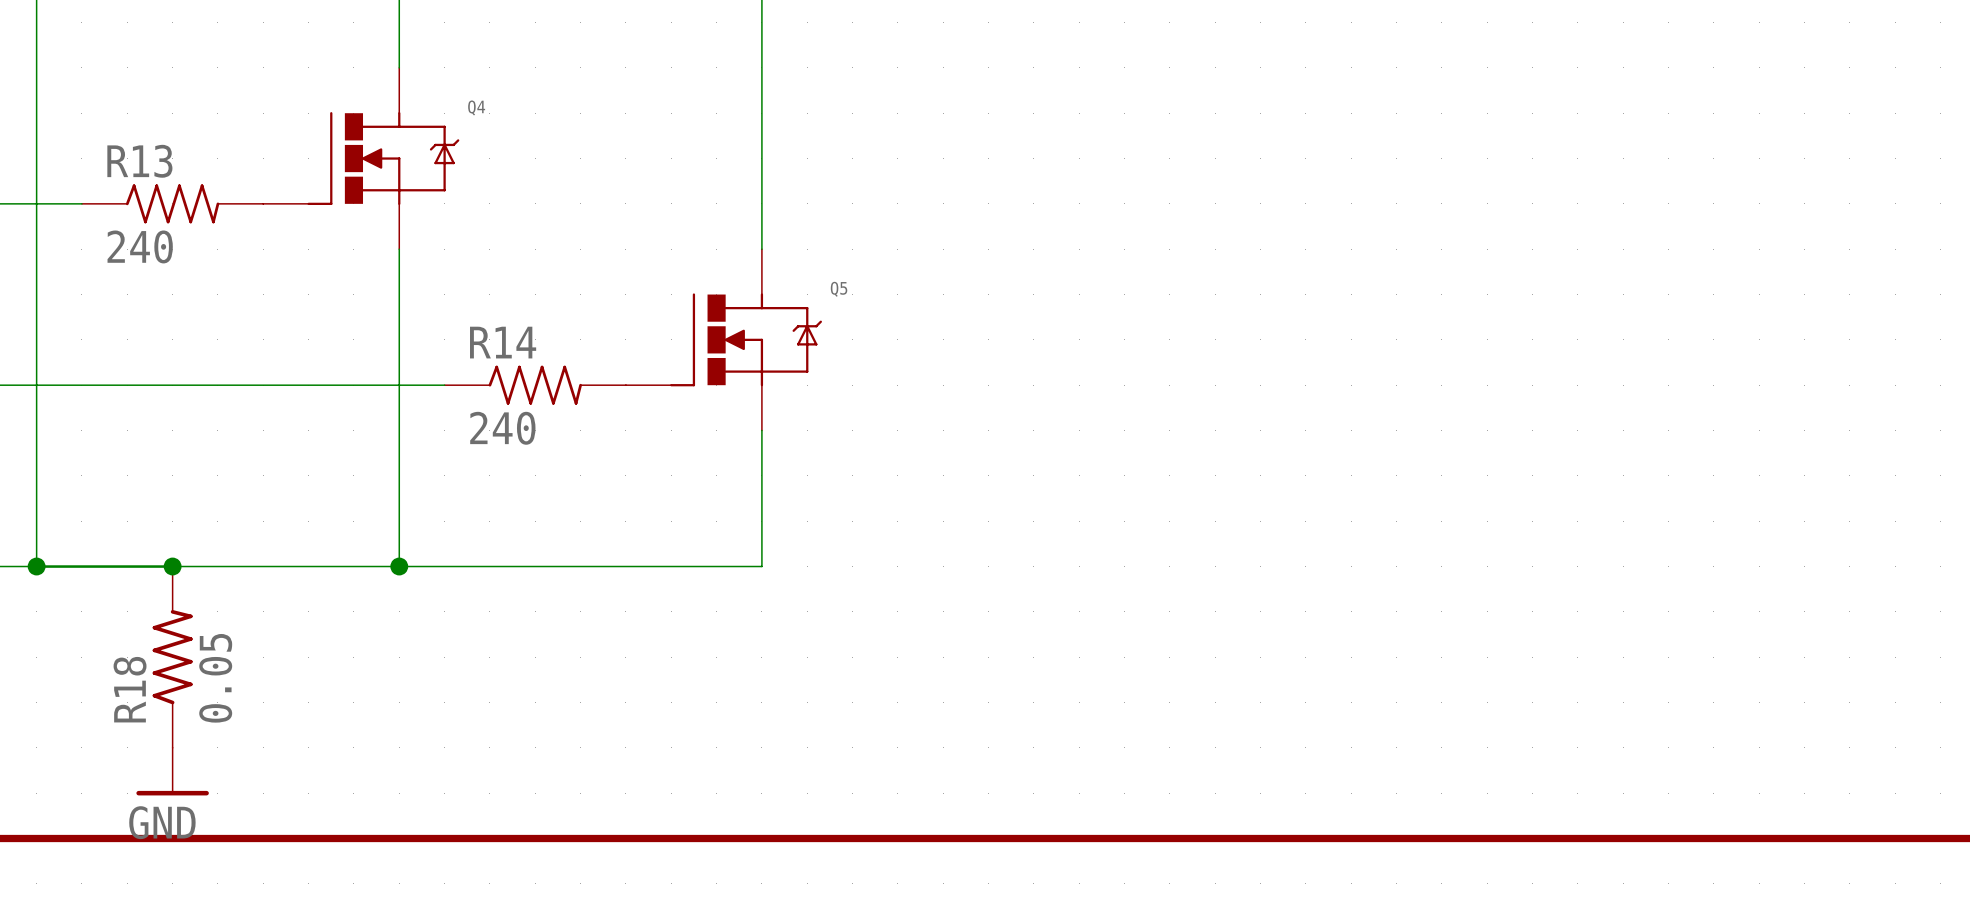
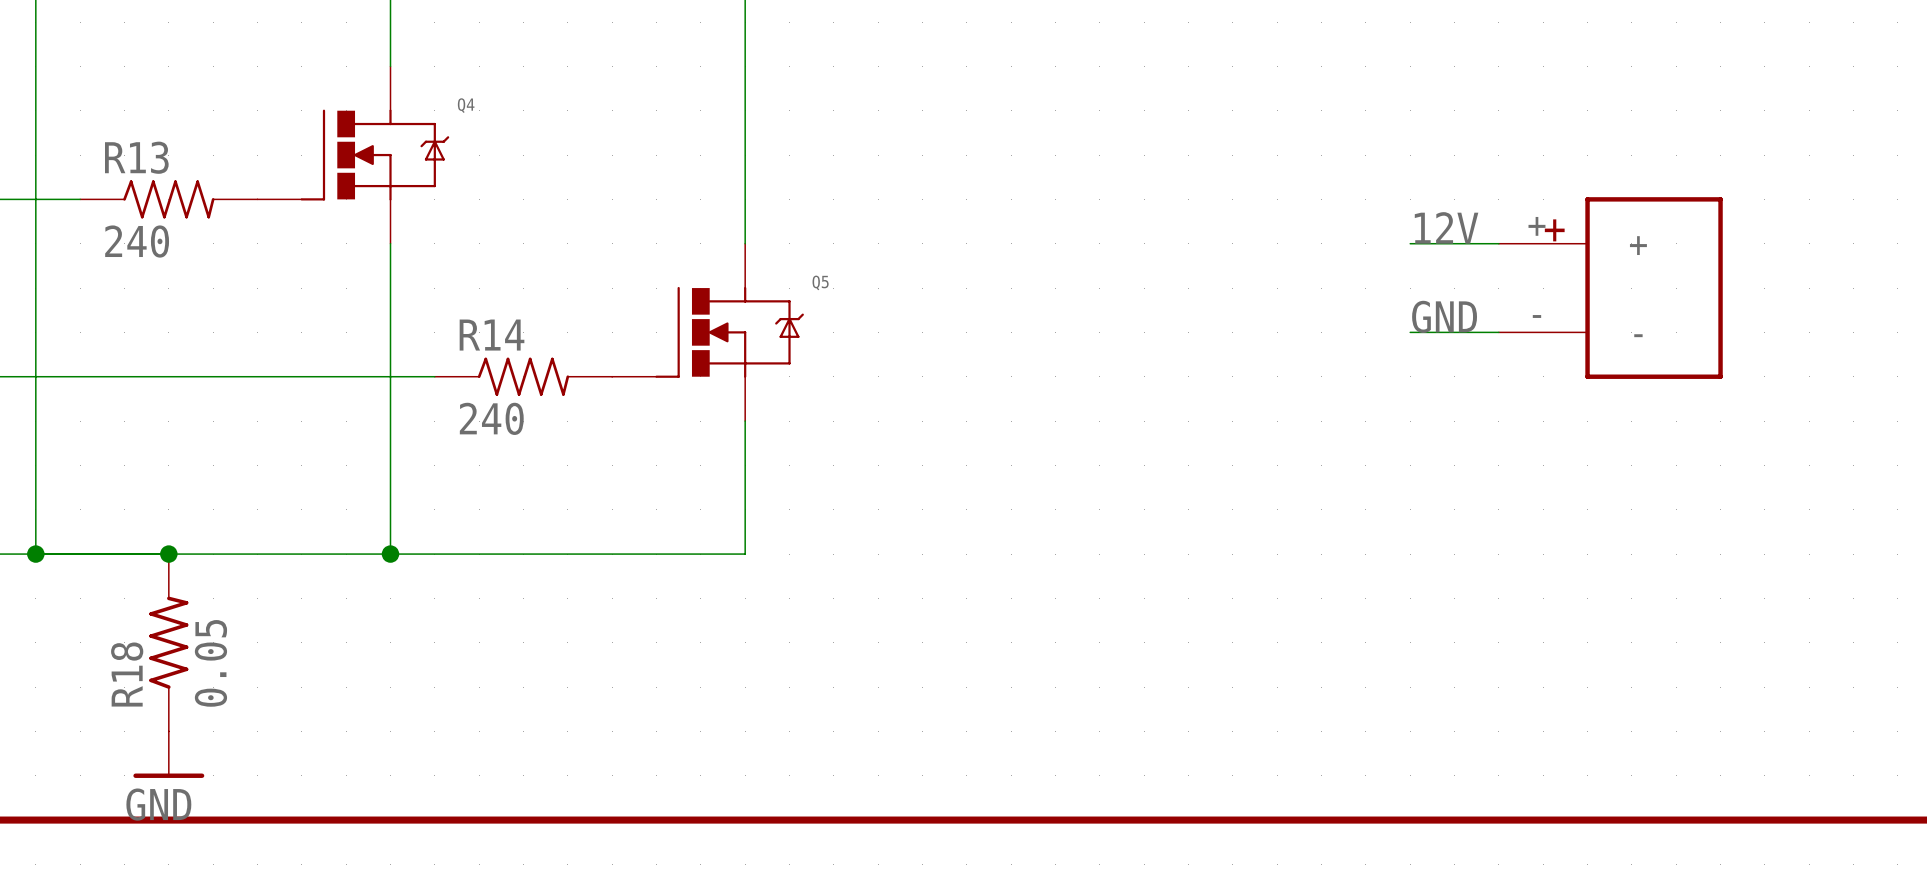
label: none -> 12V (1446, 227)
wire: none -> (1410, 243) (1498, 243)
part: none -> (1610, 288)
label: none -> GND (1444, 316)
wire: none -> (1410, 332) (1498, 332)

